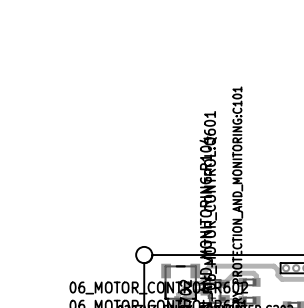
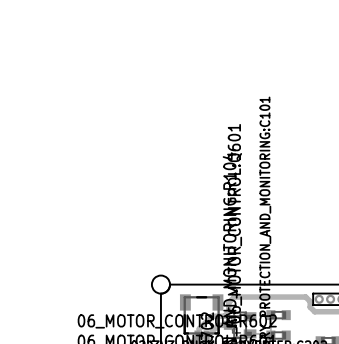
track: (256, 282) (256, 276) (253, 273) (234, 273) (224, 283) -> none

